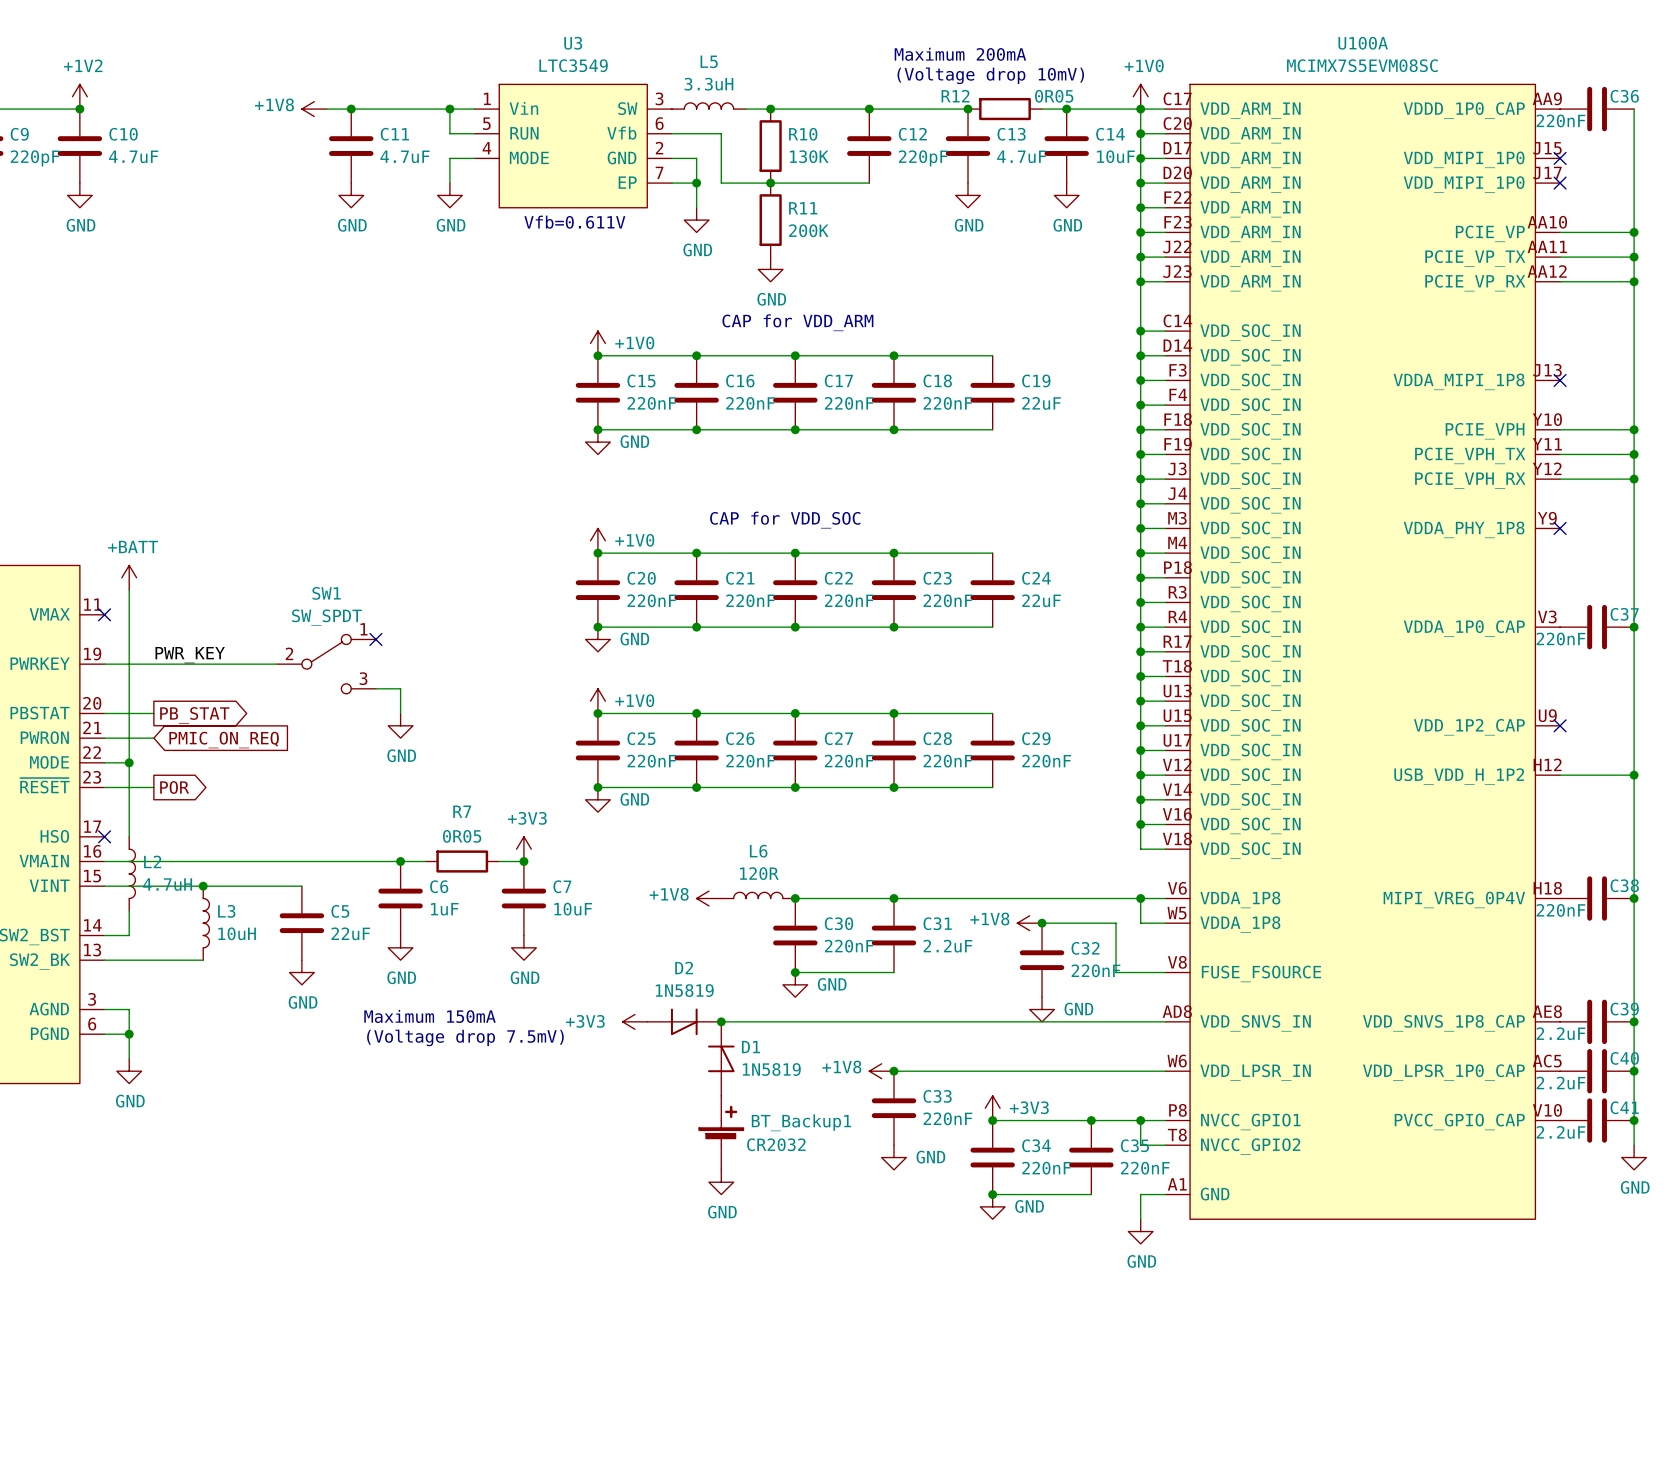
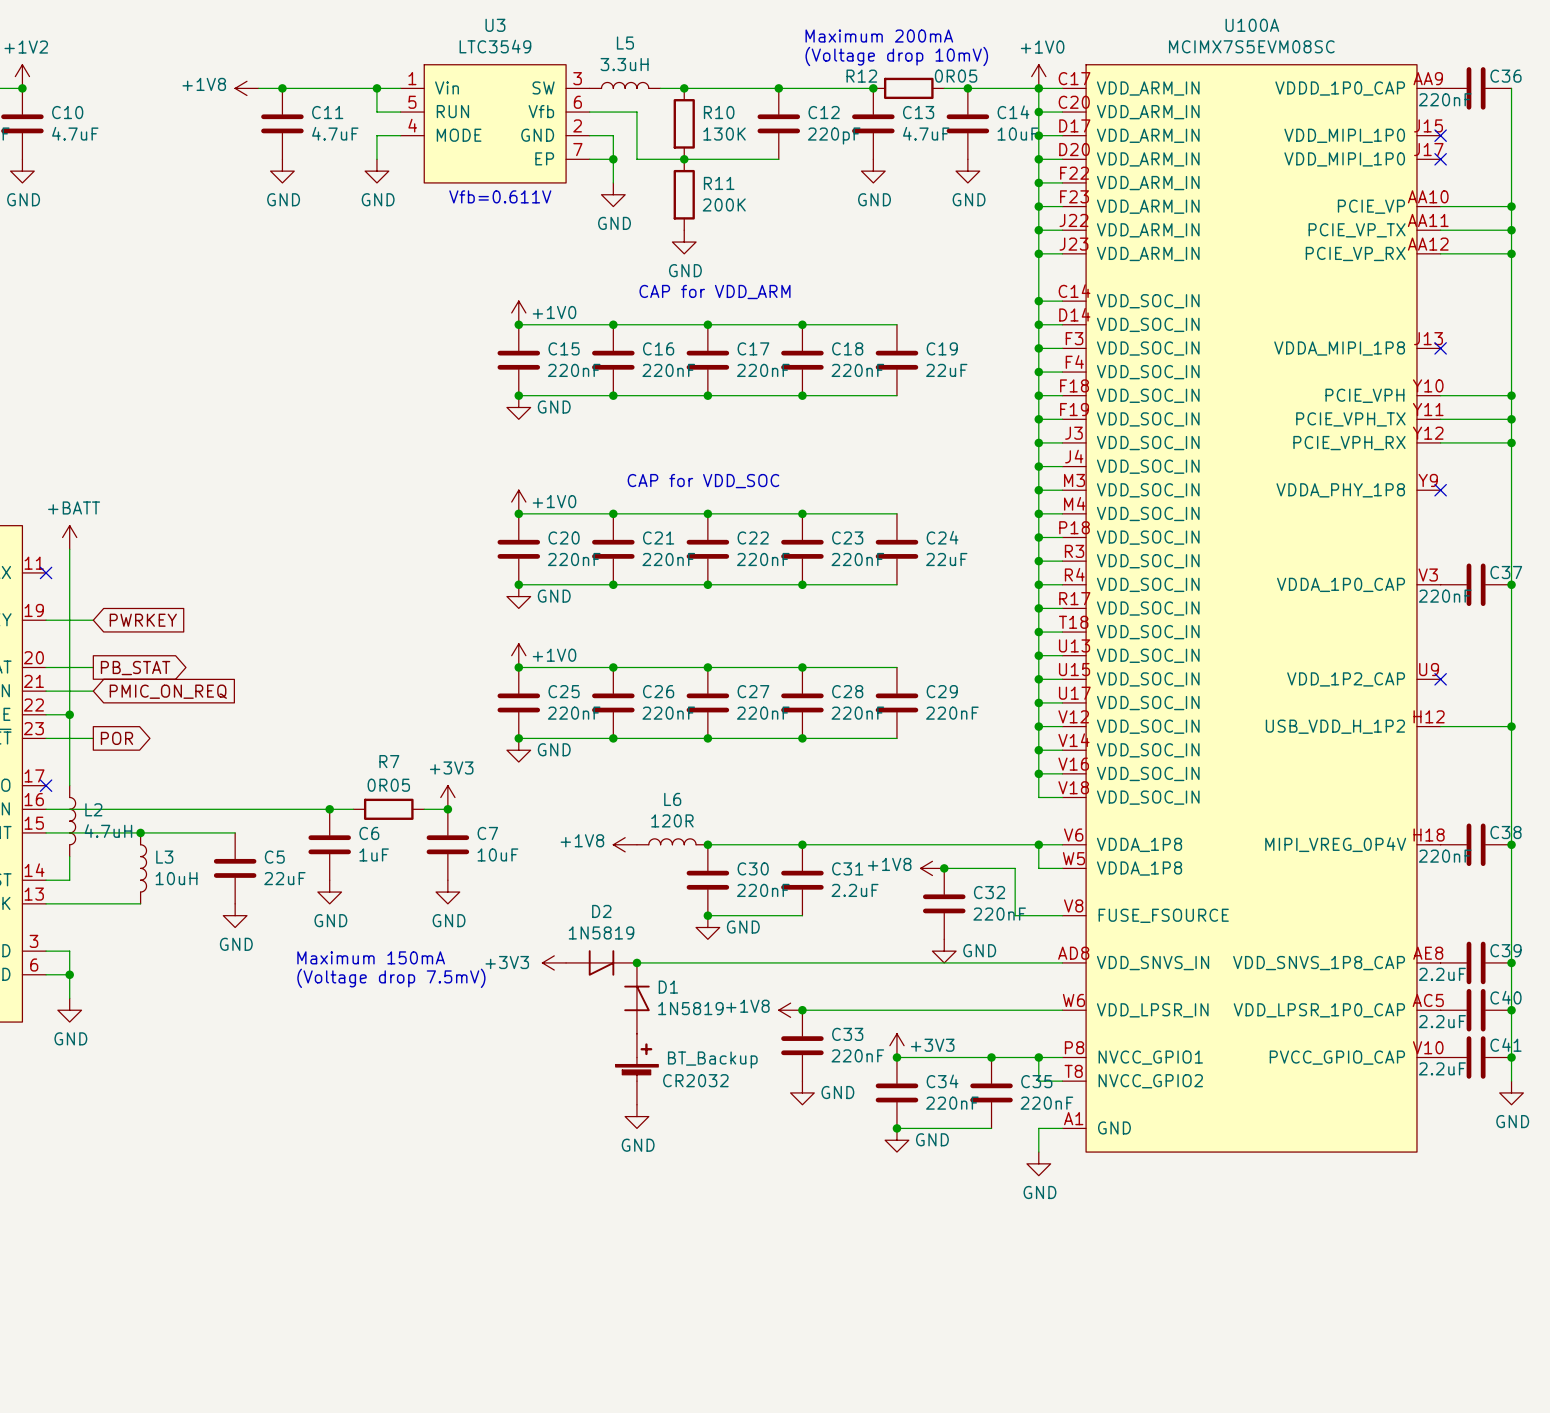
no-connect mark: (375, 639) -> none
label: PWR_KEY (190, 655) -> none
wire: (153, 664) (277, 664) -> none
global label: none -> PWRKEY (143, 620)
SW1: SW_SPDT (326, 664) -> none
wire: (375, 688) (400, 688) (400, 713) -> none
power symbol: GND (400, 725) -> none
BT_Backup1 name: BT_Backup1 (801, 1122) -> BT_Backup (712, 1059)

